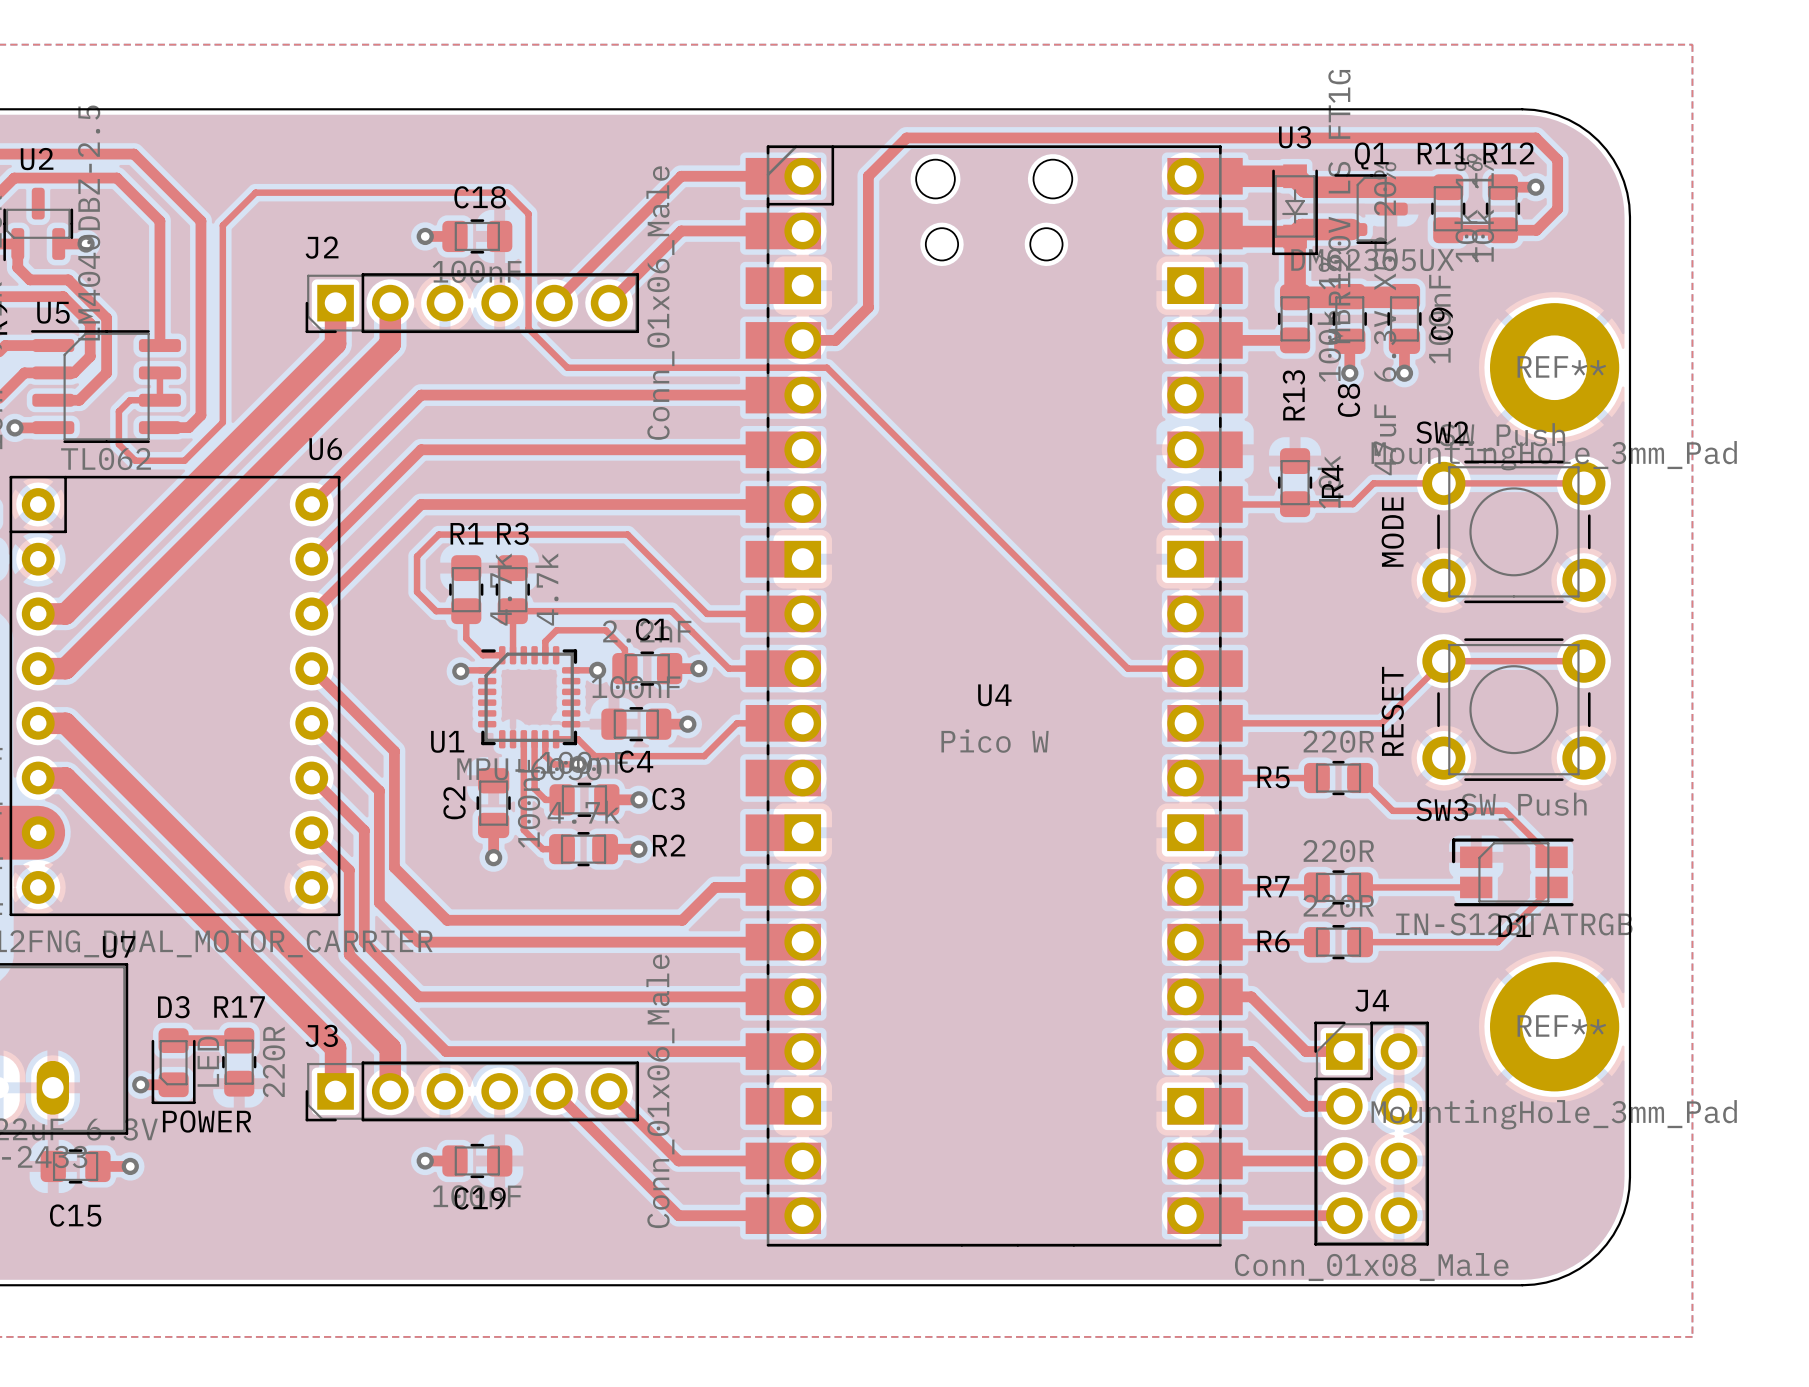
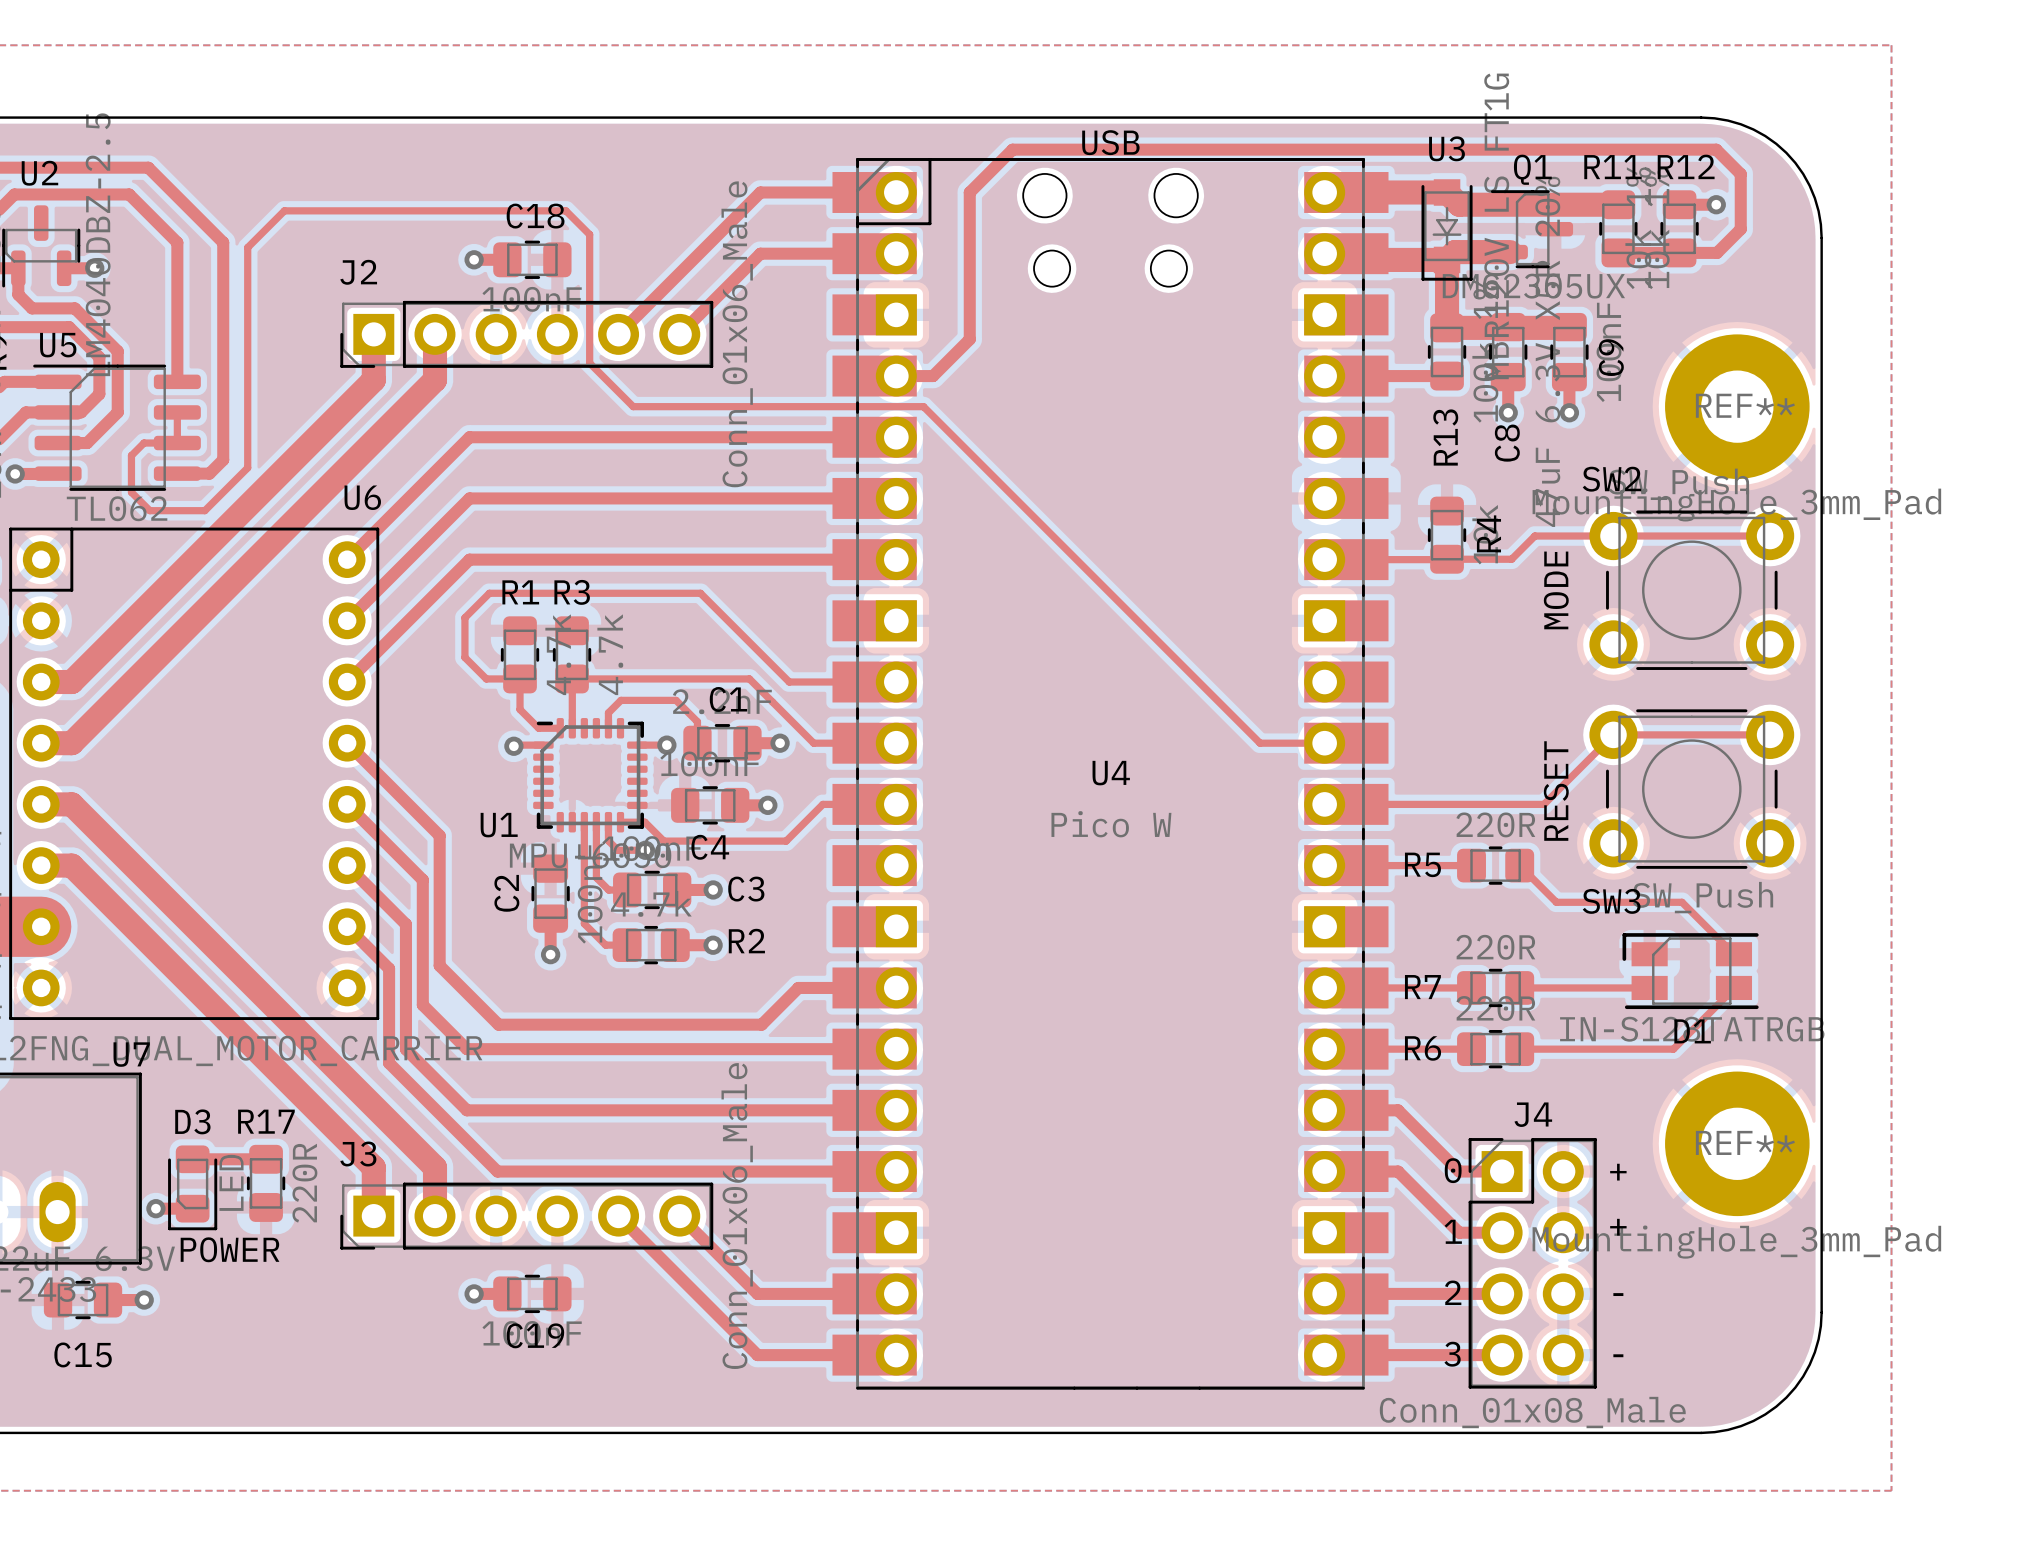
text: none -> USB (1110, 142)
text: none -> 0 (1453, 1170)
text: none -> + (1618, 1172)
text: none -> + (1618, 1227)
text: none -> 1 (1453, 1231)
text: none -> 2 (1453, 1292)
text: none -> - (1618, 1294)
text: none -> 3 (1452, 1354)
text: none -> - (1618, 1355)

